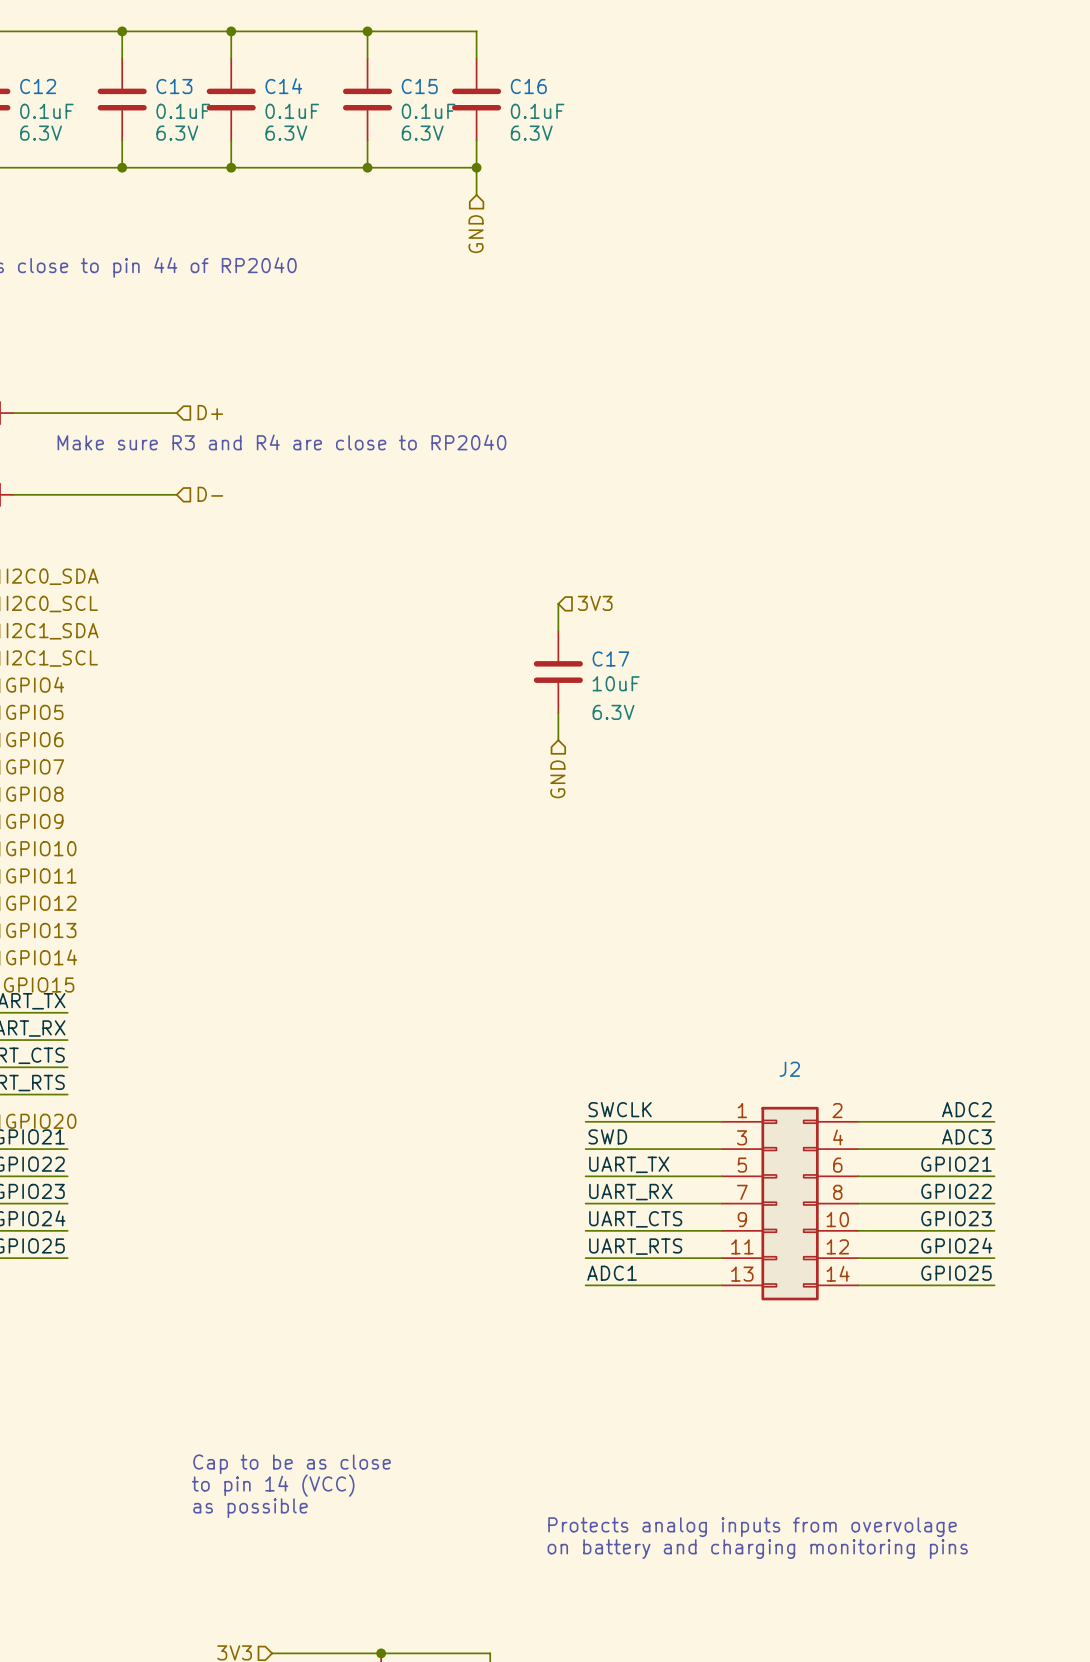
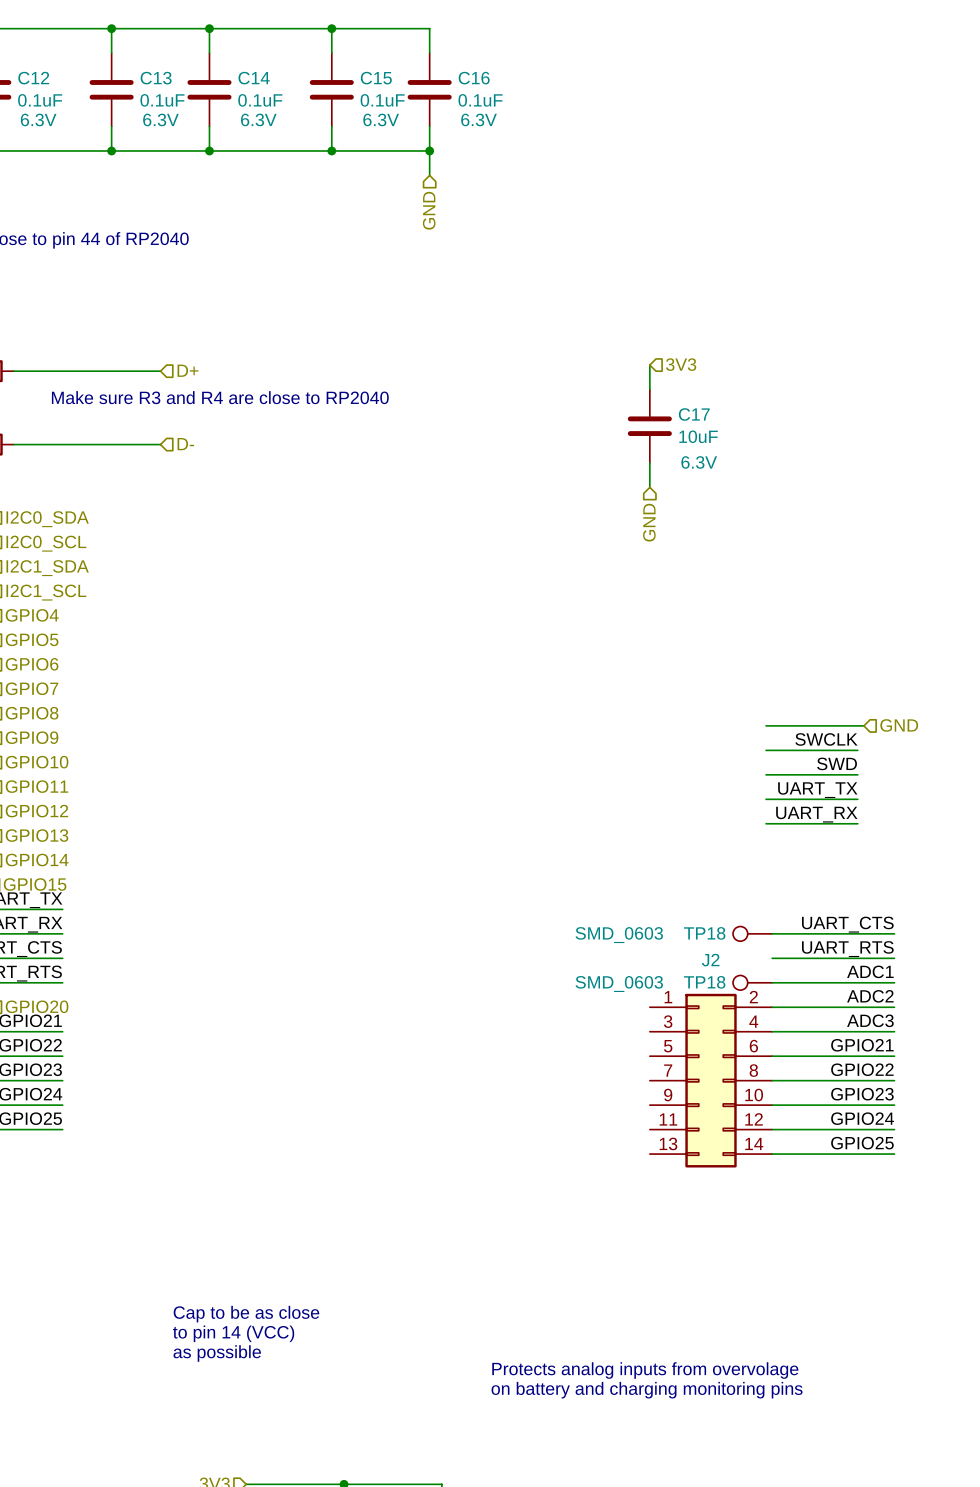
hierarchical label: none -> GND (649, 522)
wire: (558, 603) (558, 631) -> (649, 365) (649, 389)
hierarchical label position: 3V3 (595, 603) -> 3V3 (681, 364)
C17 position: (558, 672) -> (649, 426)
wire: (558, 712) (558, 740) -> (649, 462) (649, 487)
hierarchical label: GND (557, 779) -> none
hierarchical label: none -> GND (899, 725)
wire: none -> (766, 725) (863, 725)
label: none -> SWCLK (826, 739)
wire: none -> (766, 750) (857, 750)
label: none -> SWD (837, 763)
wire: none -> (766, 774) (857, 774)
label: none -> UART_TX (817, 790)
wire: none -> (766, 799) (857, 799)
label: none -> UART_RX (816, 814)
wire: none -> (766, 823) (857, 823)
label: none -> UART_CTS (847, 924)
TP18: none -> SMD_0603 (752, 933)
wire: none -> (772, 933) (894, 933)
label: none -> UART_RTS (847, 949)
wire: none -> (772, 958) (894, 958)
label: none -> ADC1 (870, 971)
TP18: none -> SMD_0603 (752, 982)
wire: none -> (772, 982) (894, 982)
label: SWCLK (620, 1109) -> none
wire: (585, 1121) (721, 1121) -> none
label: SWD (607, 1136) -> none
wire: (585, 1149) (721, 1149) -> none
label: UART_TX (629, 1164) -> none
wire: (585, 1176) (721, 1176) -> none
label: UART_RX (630, 1192) -> none
wire: (585, 1203) (721, 1203) -> none
label: UART_CTS (635, 1219) -> none
wire: (585, 1230) (721, 1230) -> none
label: UART_RTS (635, 1246) -> none
wire: (585, 1258) (721, 1258) -> none
label: ADC1 (612, 1273) -> none
wire: (585, 1285) (721, 1285) -> none

